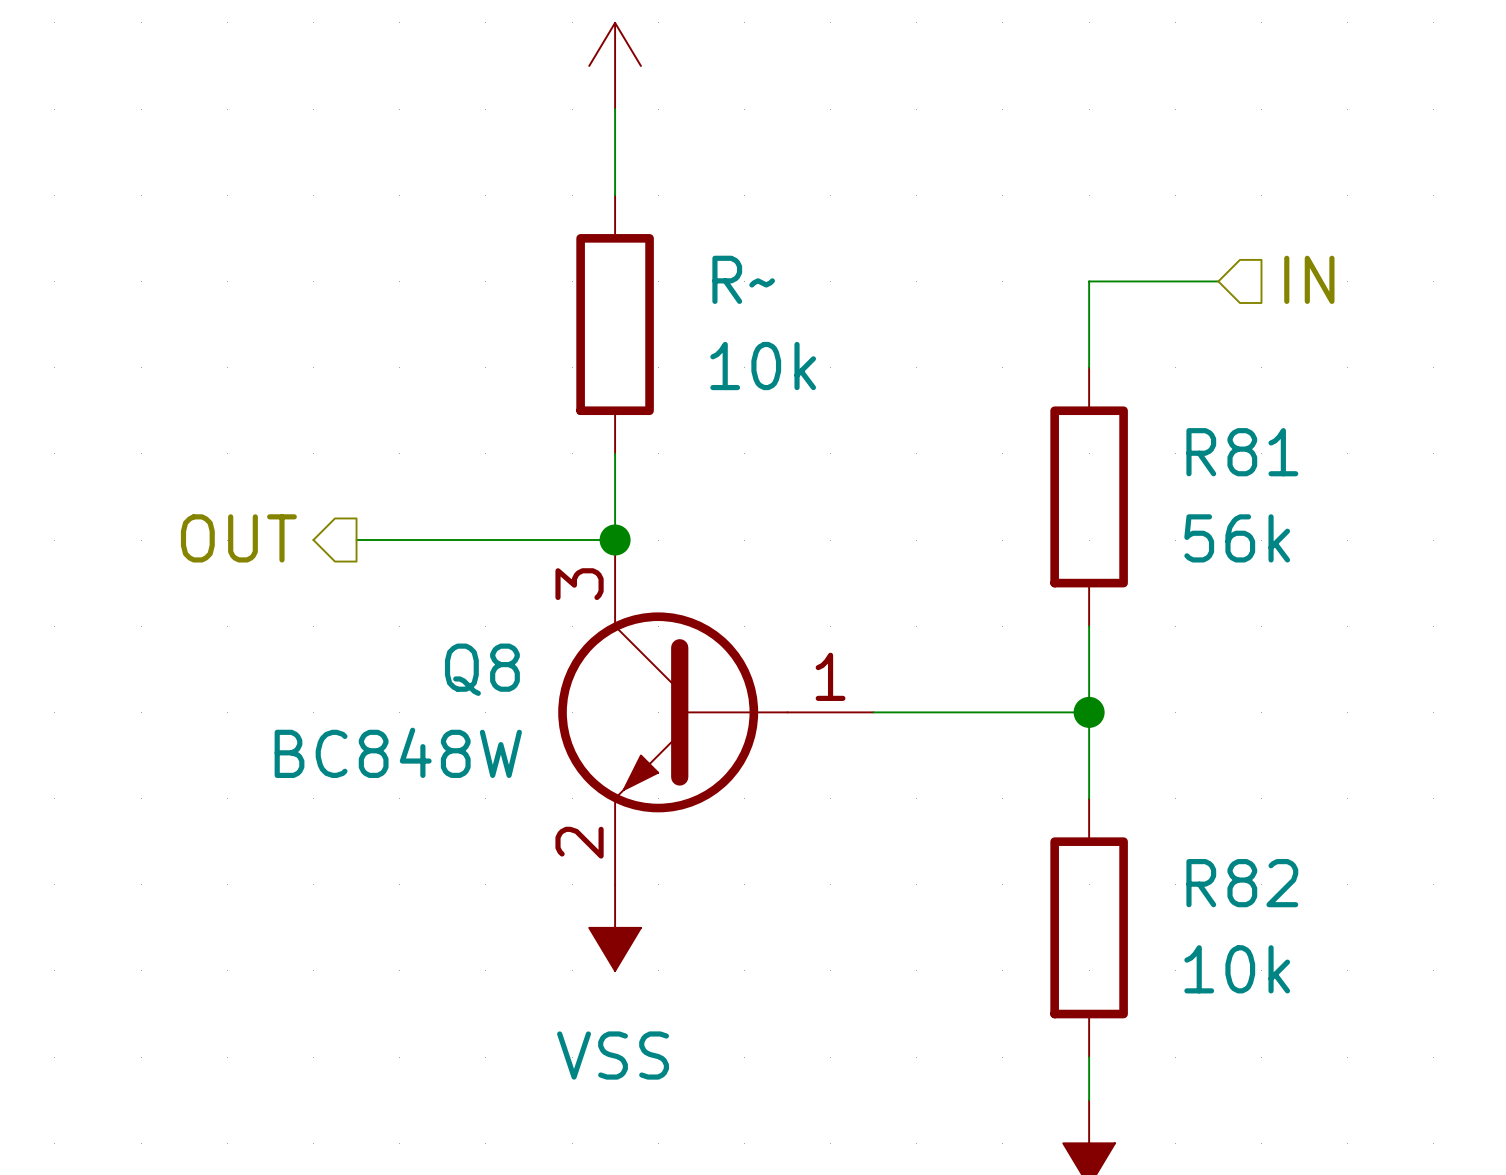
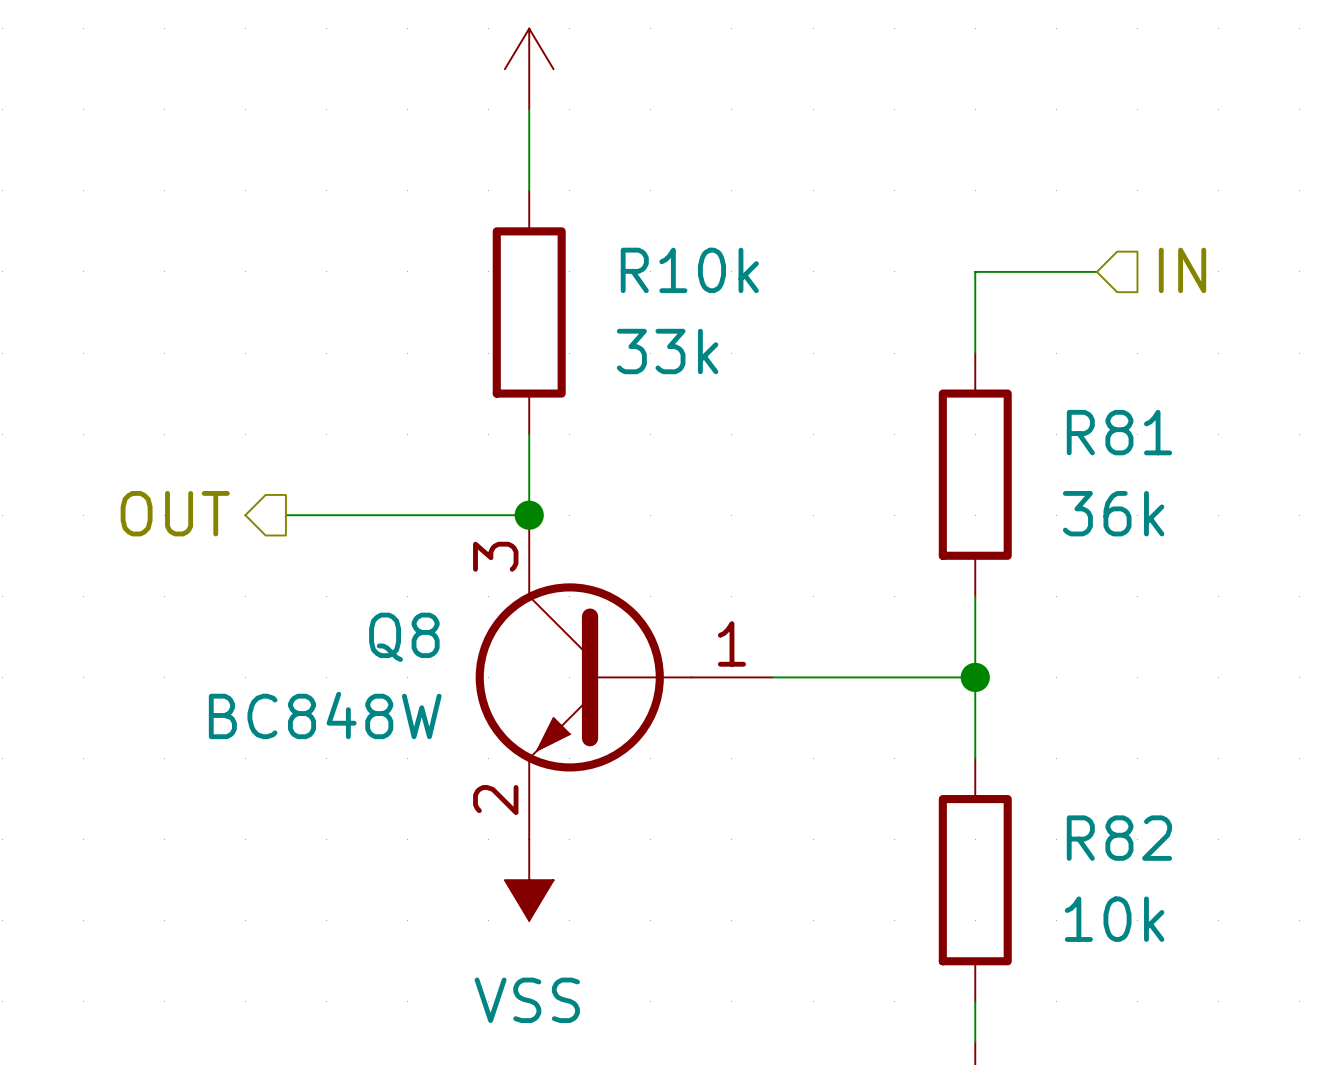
R~ name: R~ (743, 279) -> R10k (689, 270)
R~ value: 10k (763, 366) -> 33k (667, 351)
R81 value: 56k (1237, 538) -> 36k (1113, 513)

